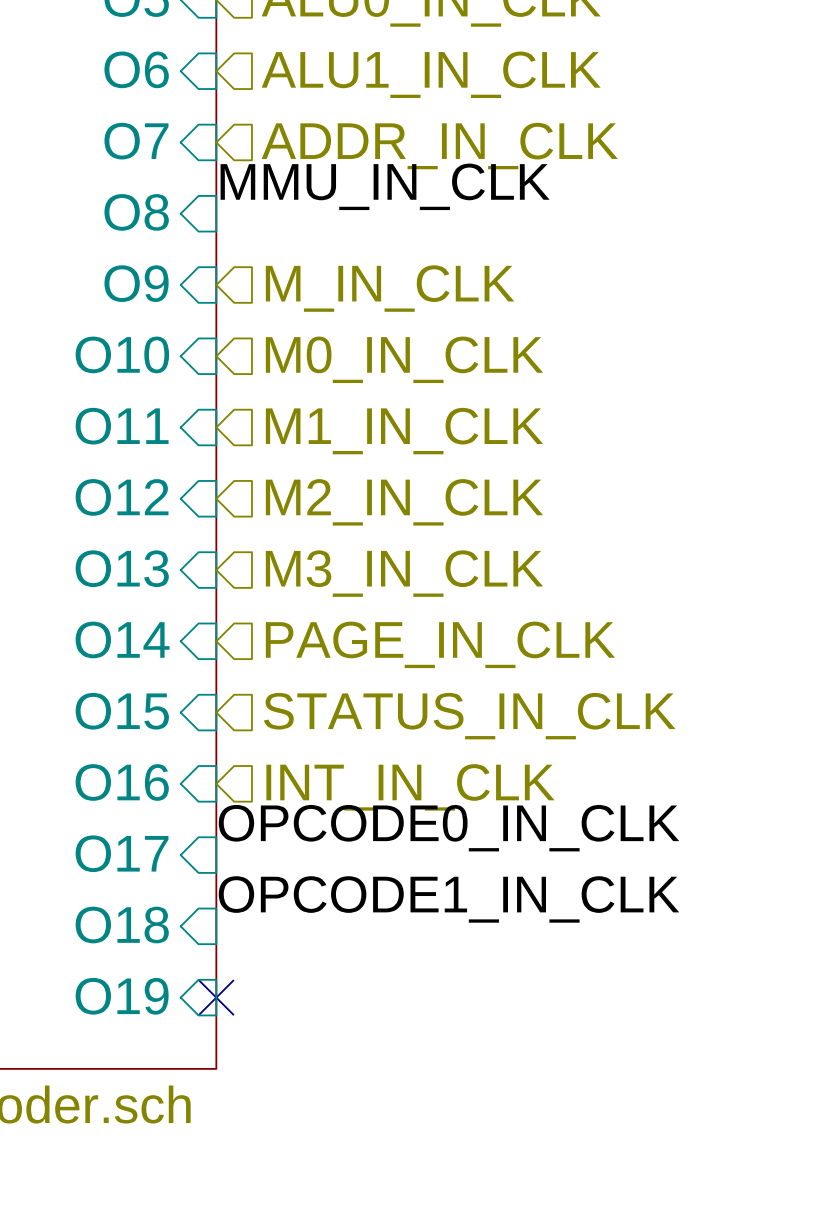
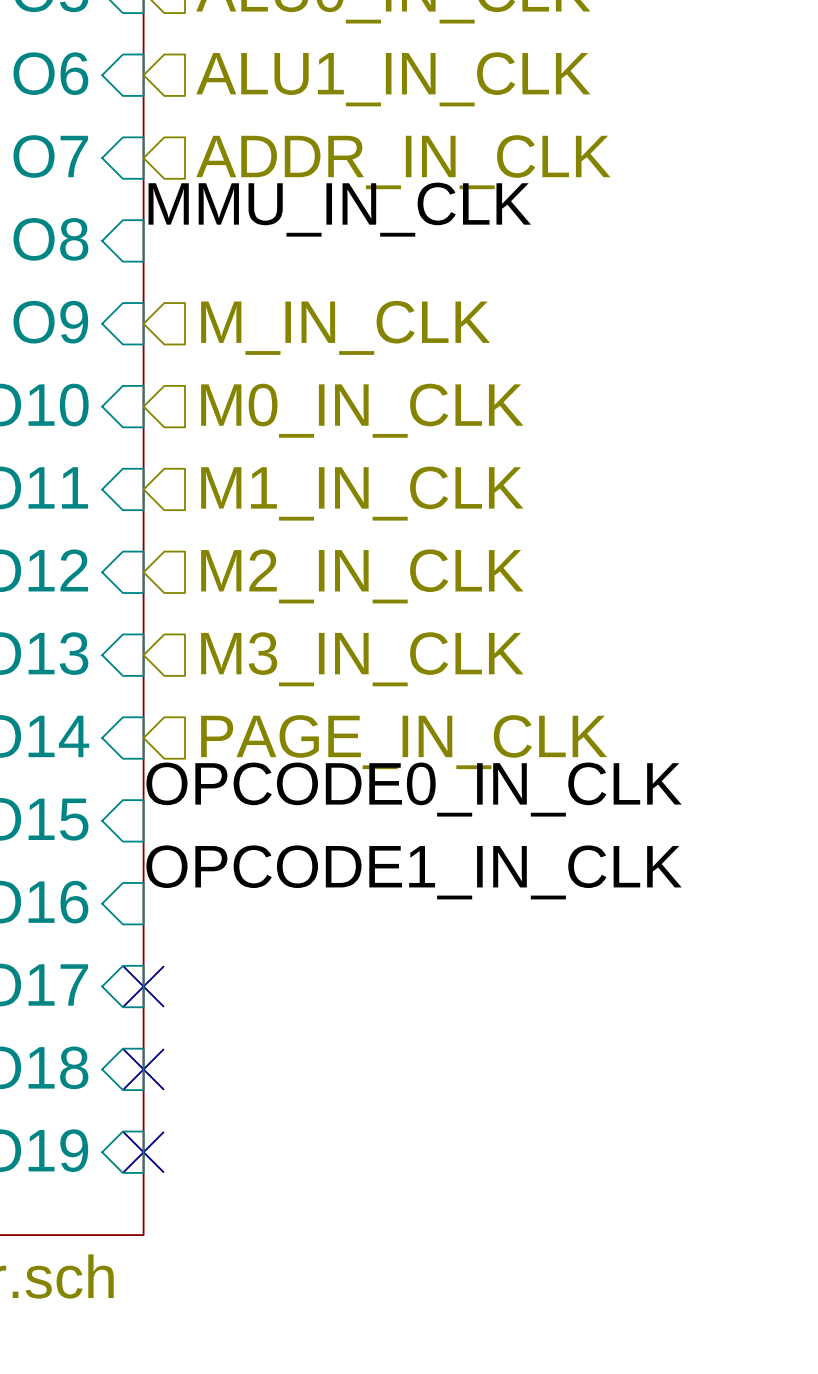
hierarchical label: STATUS_IN_CLK (469, 716) -> none
hierarchical label: INT_IN_CLK (410, 787) -> none
label position: OPCODE0_IN_CLK (448, 828) -> OPCODE0_IN_CLK (414, 789)
no-connect mark: none -> (143, 986)
label position: OPCODE1_IN_CLK (448, 899) -> OPCODE1_IN_CLK (414, 872)
no-connect mark: none -> (143, 1069)

